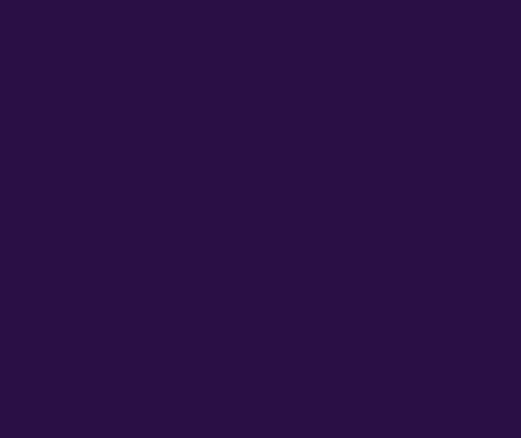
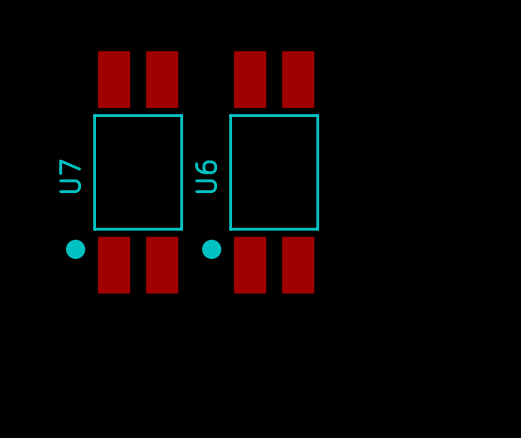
U7: none -> (124, 172)
U6: none -> (260, 172)

